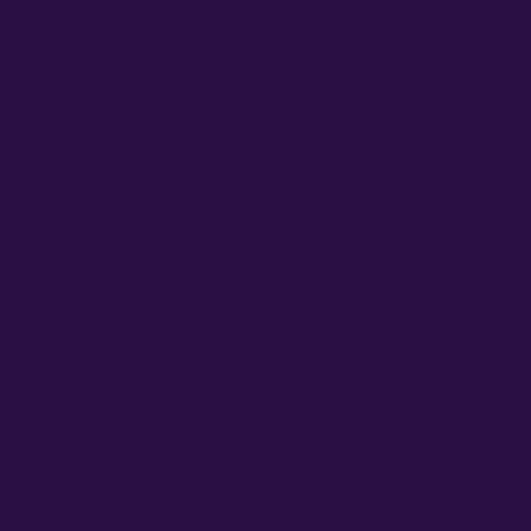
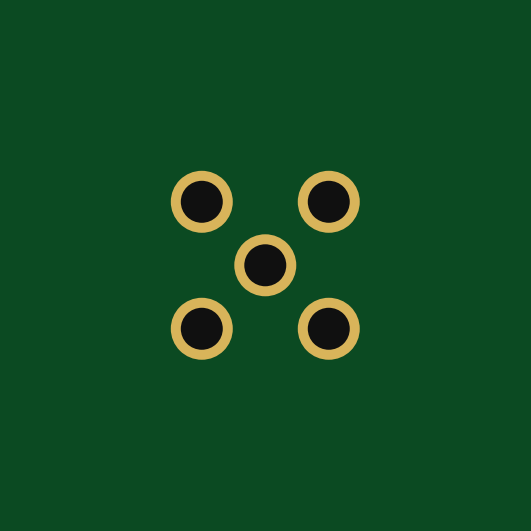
part: none -> (265, 265)

